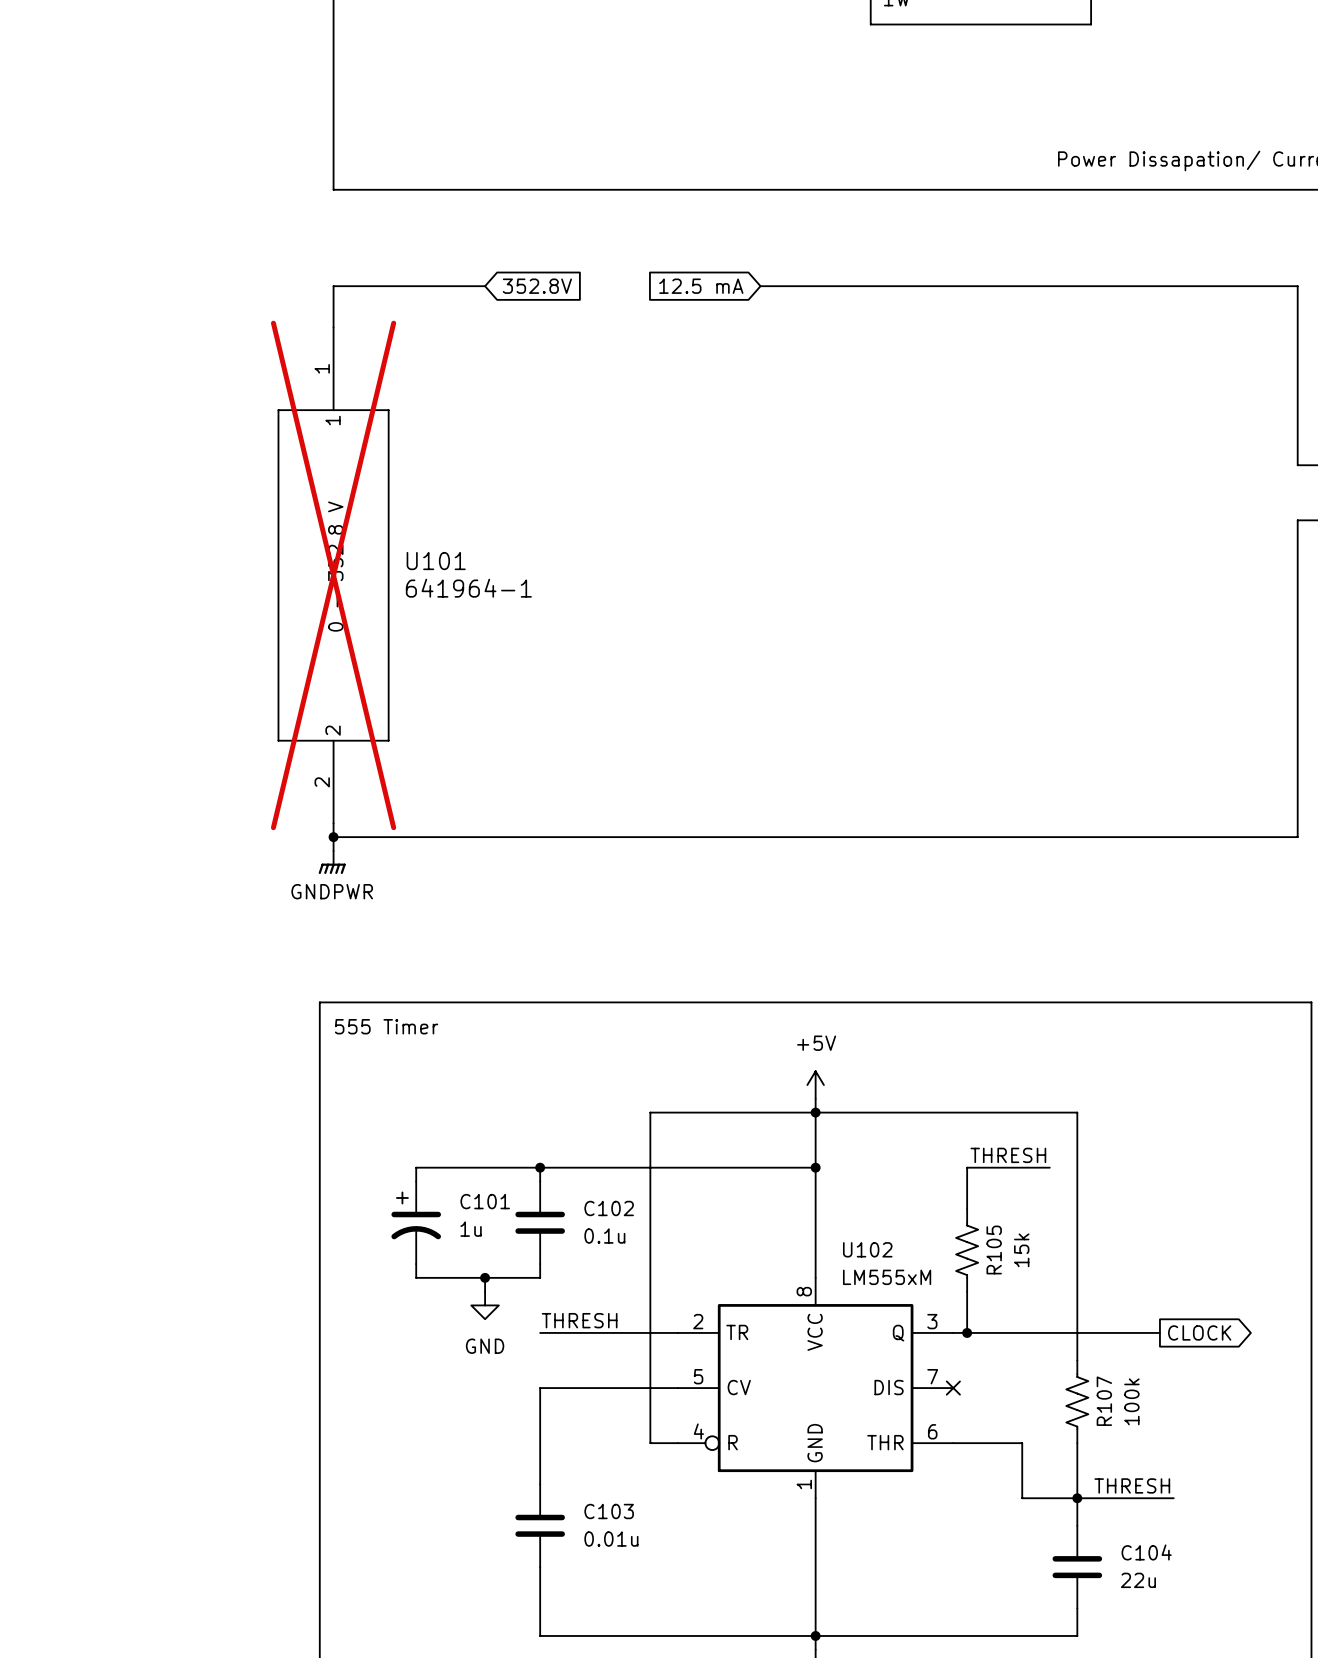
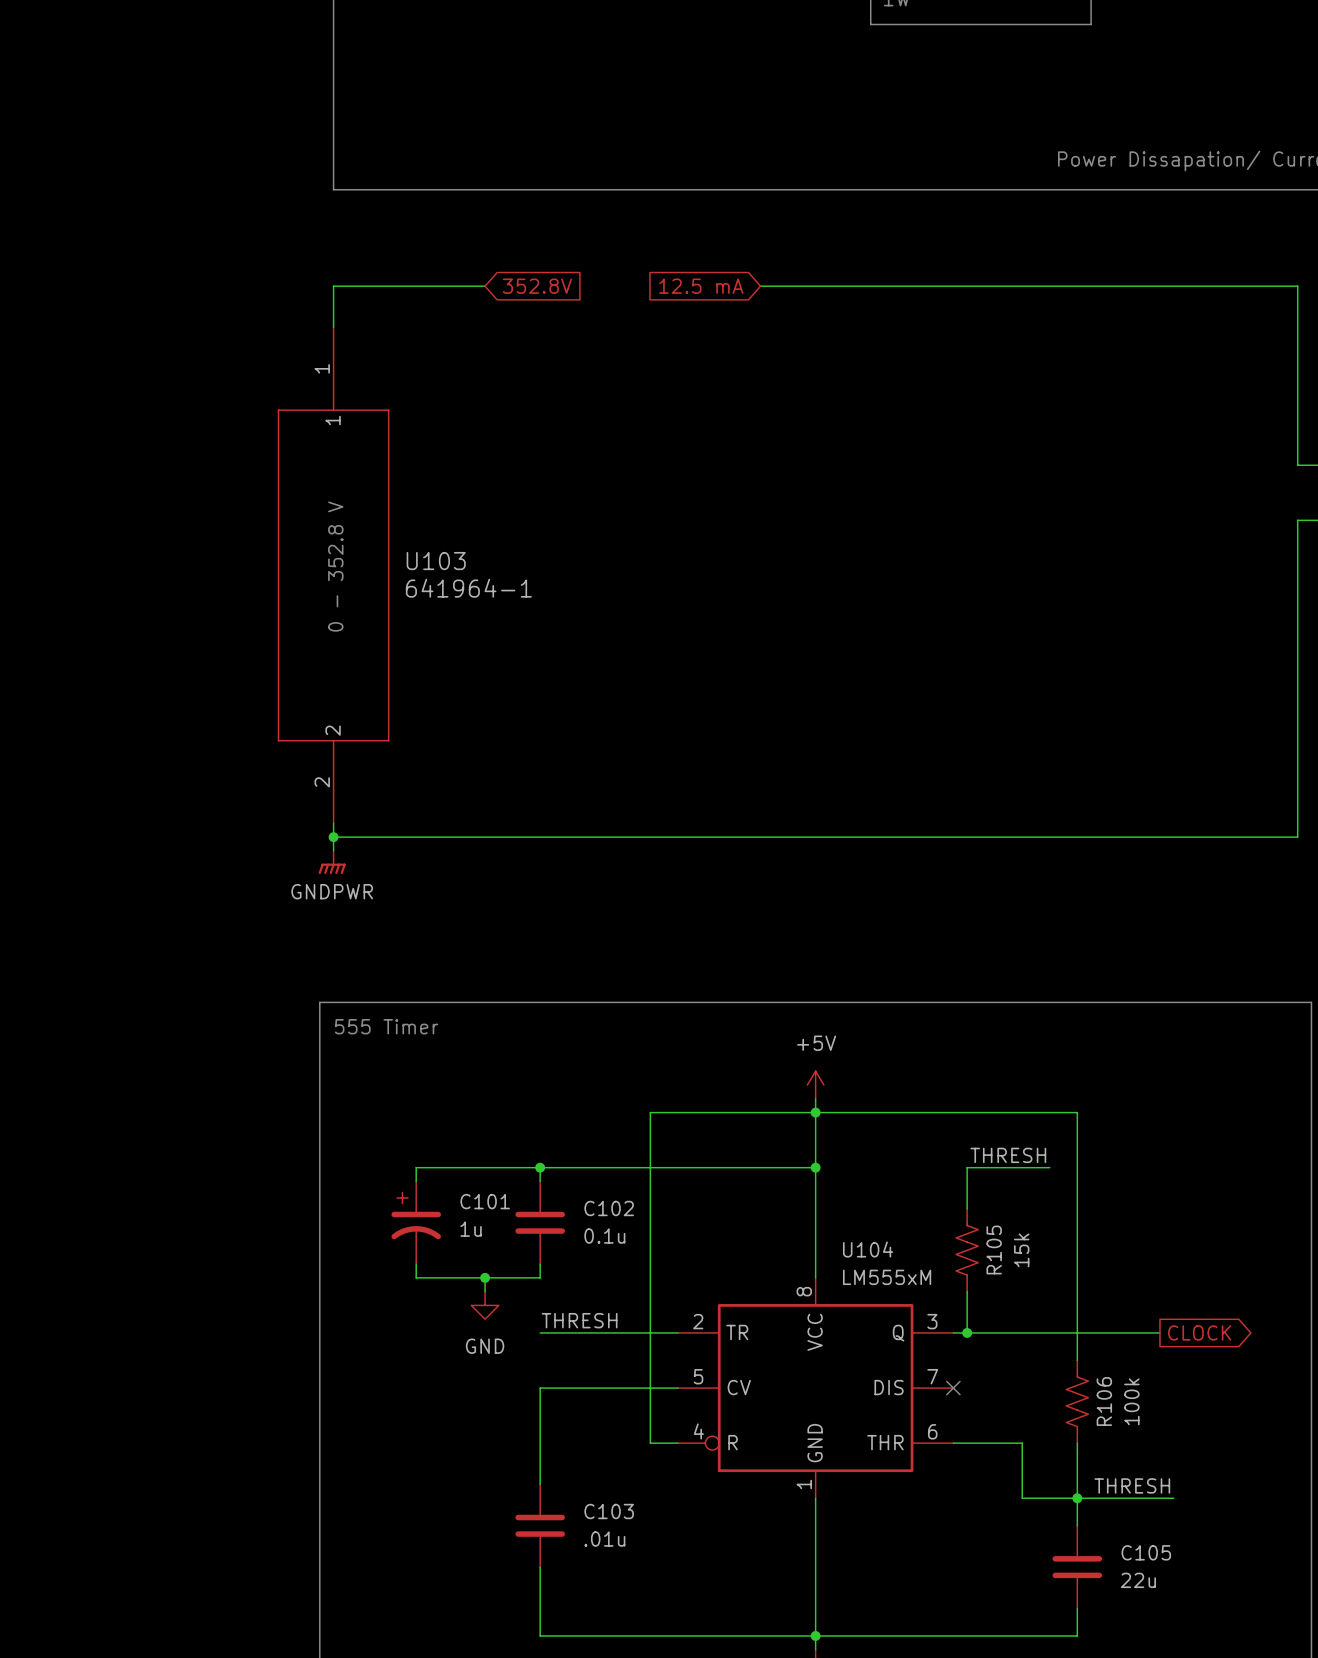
U101 name: U101 (436, 561) -> U103 (436, 561)
U101 do-not-place cross: (333, 575) -> none
U102 name: U102 (867, 1249) -> U104 (868, 1249)
R107 name: R107 (1104, 1401) -> R106 (1104, 1401)
C103 value: 0.01u (611, 1539) -> .01u (604, 1539)
C104 name: C104 (1146, 1552) -> C105 (1146, 1552)

